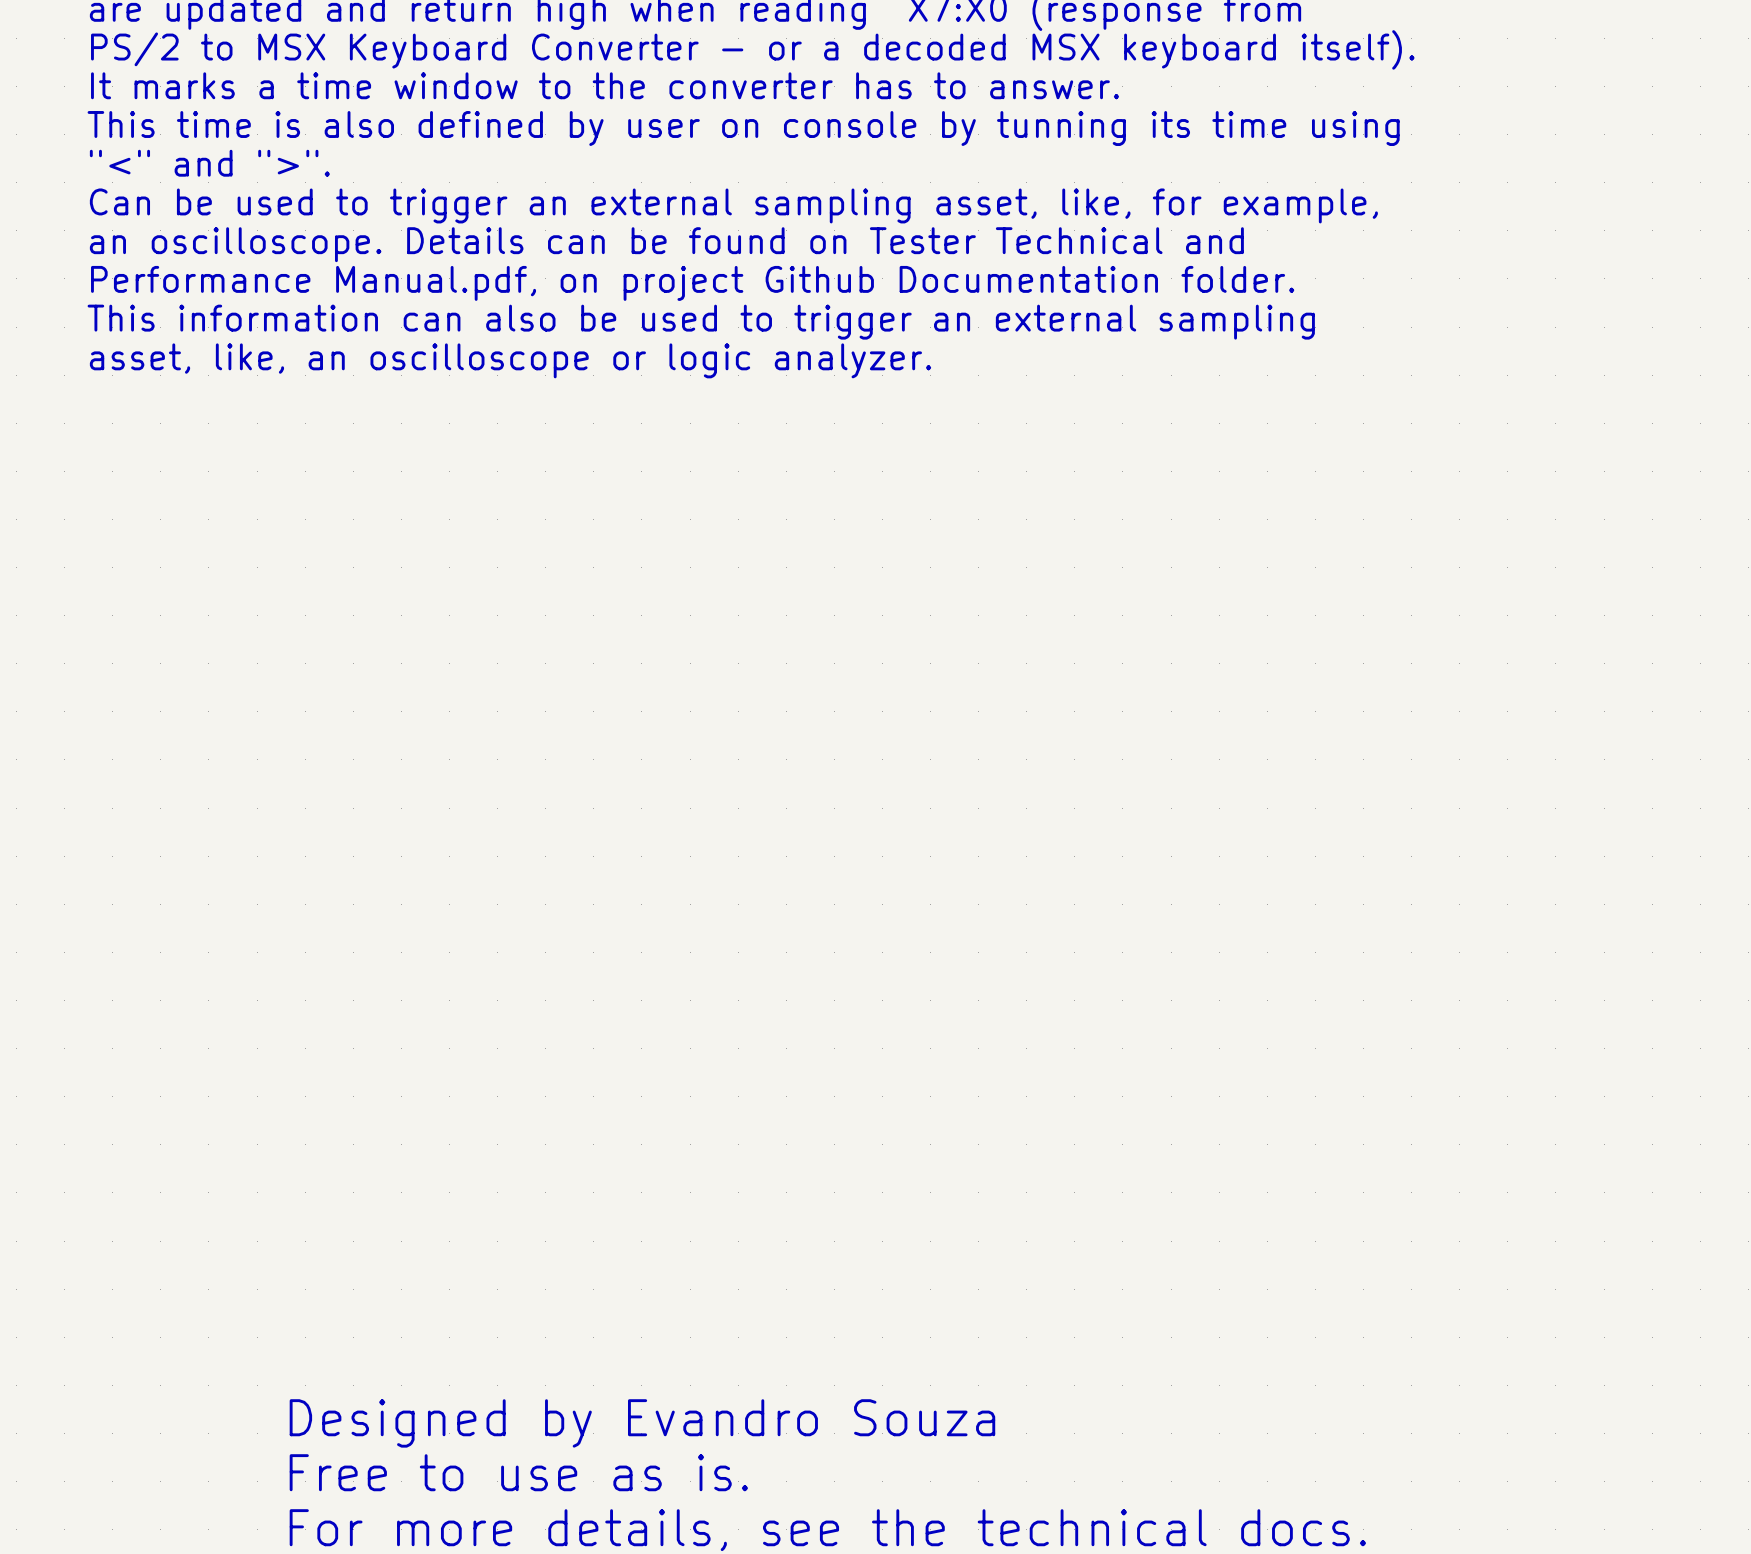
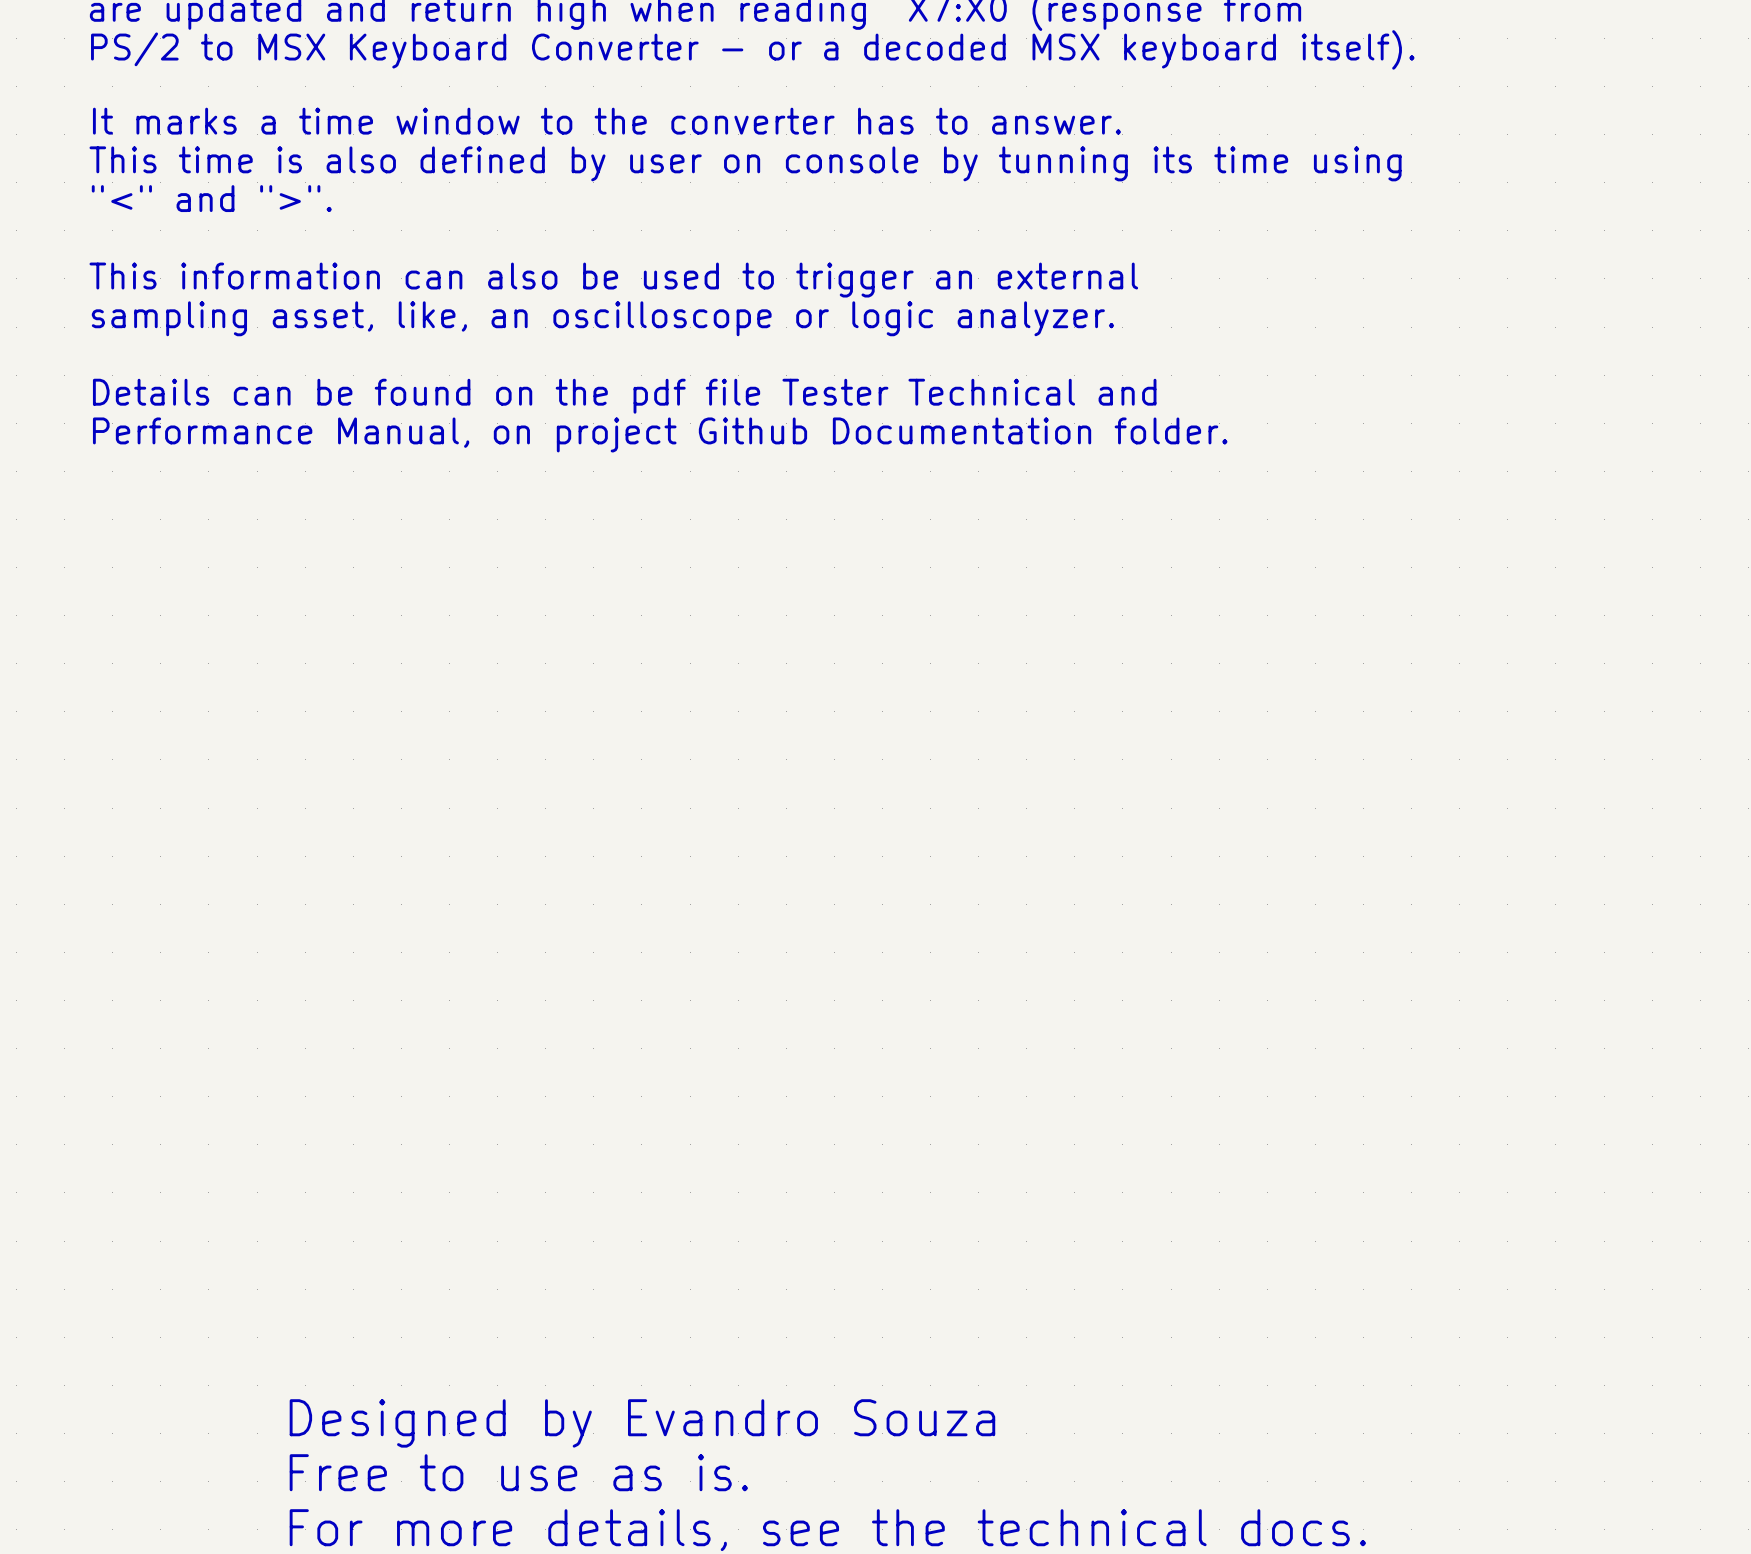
text position: It marks a time window to the converter has to answer. (605, 85) -> It marks a time window to the converter has to answer. (606, 121)
text position: This time is also defined by user on console by tunning its time using (743, 128) -> This time is also defined by user on console by tunning its time using (745, 163)
text position: "<" and ">". (209, 163) -> "<" and ">". (211, 198)
text: Can be used to trigger an external sampling asset, like, for example, (733, 205) -> none
text: an oscilloscope. Details can be found on Tester Technical and (666, 244) -> none
text: Performance Manual.pdf, on project Github Documentation folder. (692, 283) -> This information can also be used to trigger an external (613, 280)
text: This information can also be used to trigger an external sampling (701, 322) -> sampling asset, like, an oscilloscope or logic analyzer. (602, 318)
text: asset, like, an oscilloscope or logic analyzer. (510, 360) -> none
text: none -> Details can be found on the pdf file Tester Technical and (624, 396)
text: none -> Performance Manual, on project Github Documentation folder. (660, 434)

